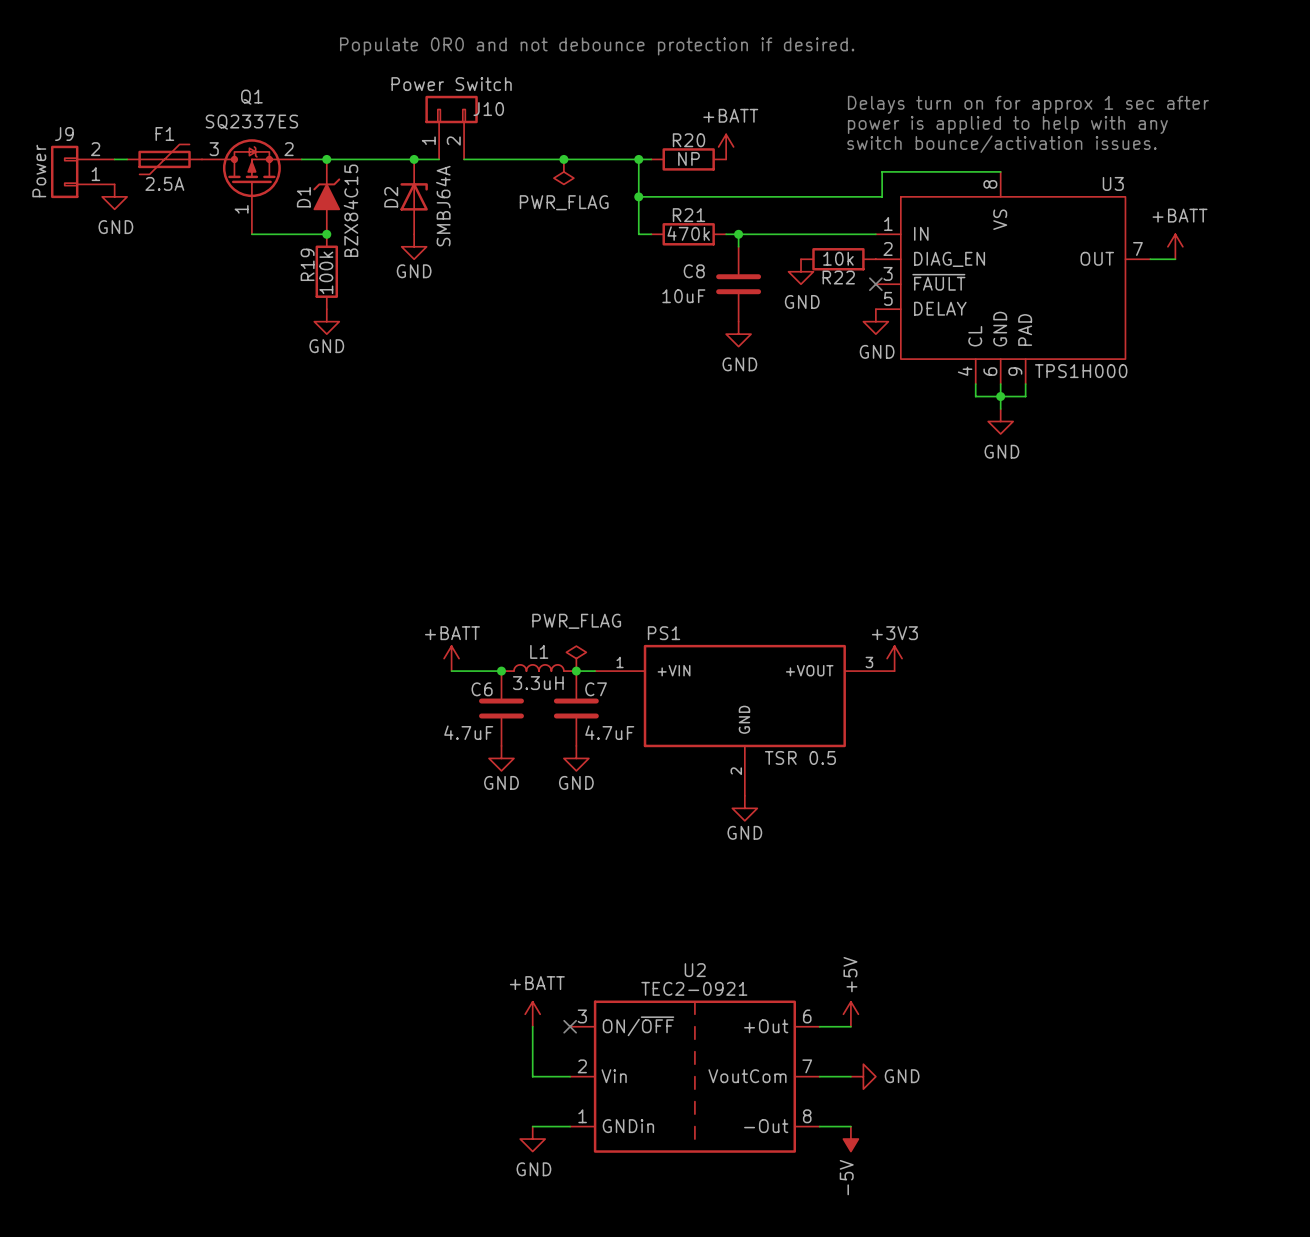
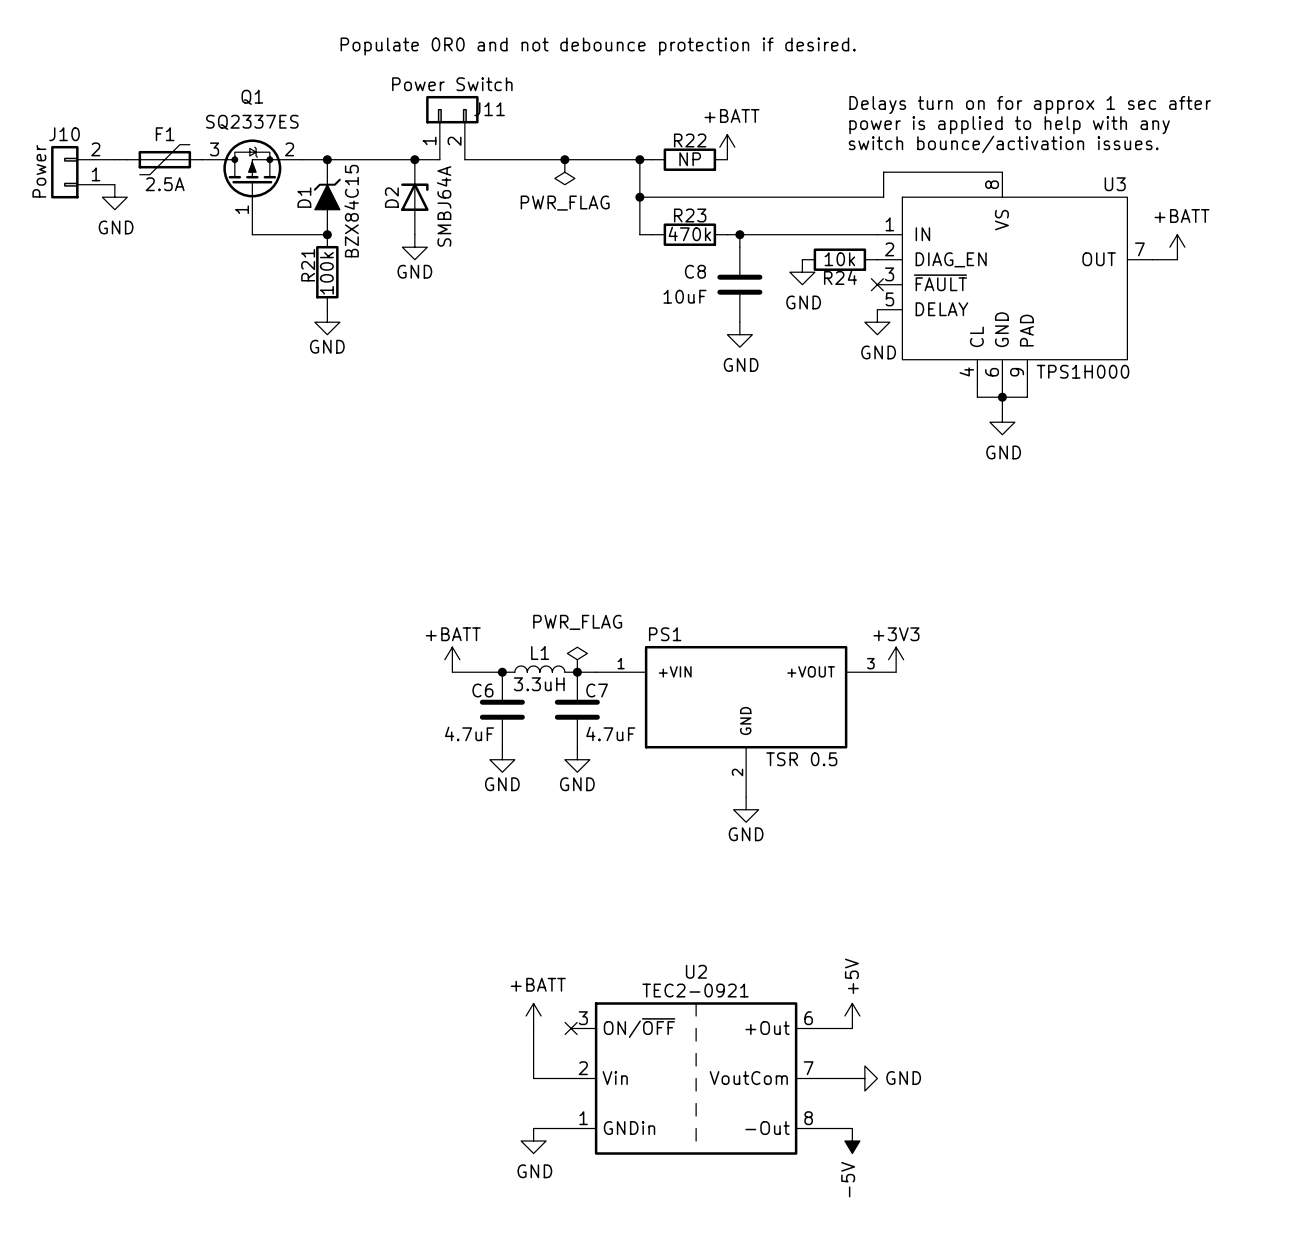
J10 name: J10 (488, 109) -> J11 (489, 109)
J9 name: J9 (64, 134) -> J10 (64, 134)
R20 name: R20 (688, 140) -> R22 (690, 140)
R21 name: R21 (688, 215) -> R23 (690, 215)
R19 name: R19 (307, 264) -> R21 (308, 265)
R22 name: R22 (838, 277) -> R24 (840, 277)

